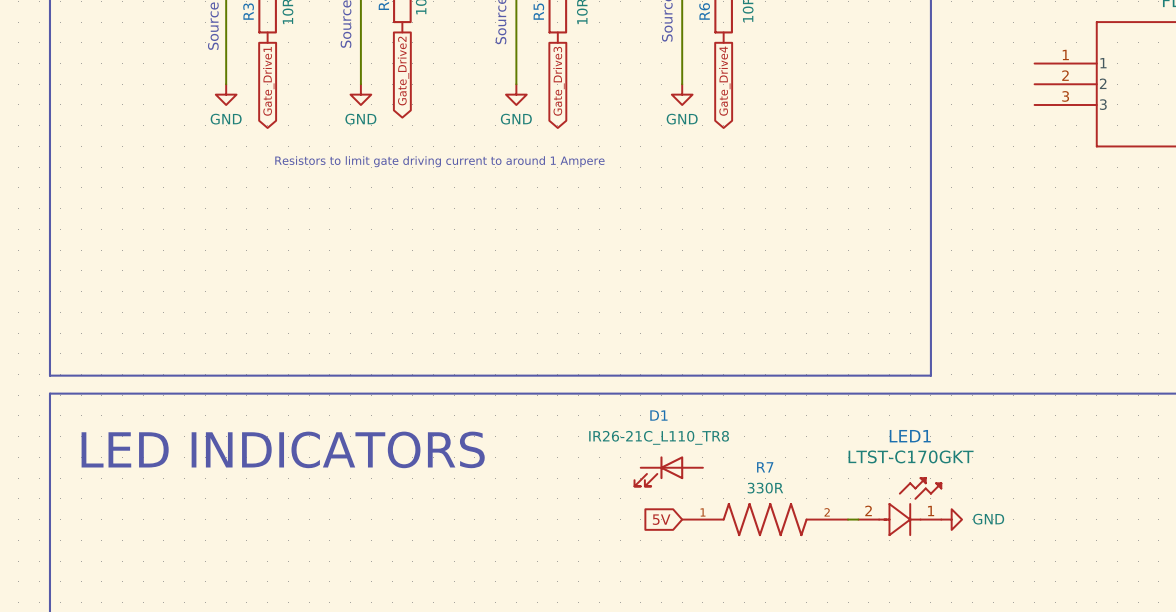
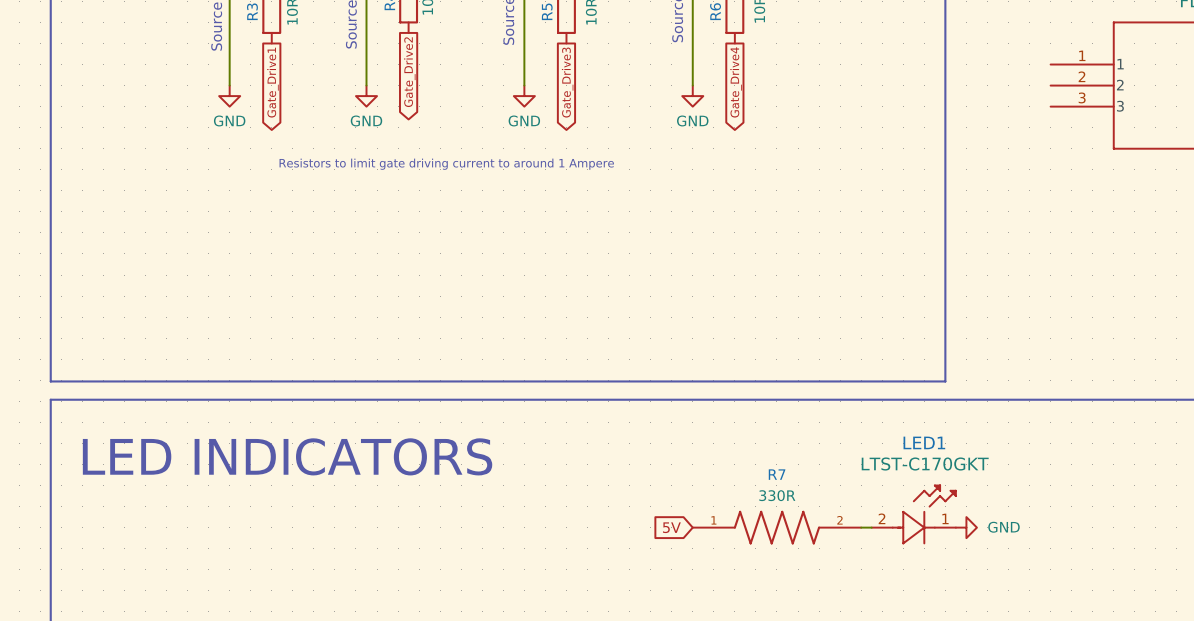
D1: IR26-21C_L110_TR8 (668, 471) -> none

